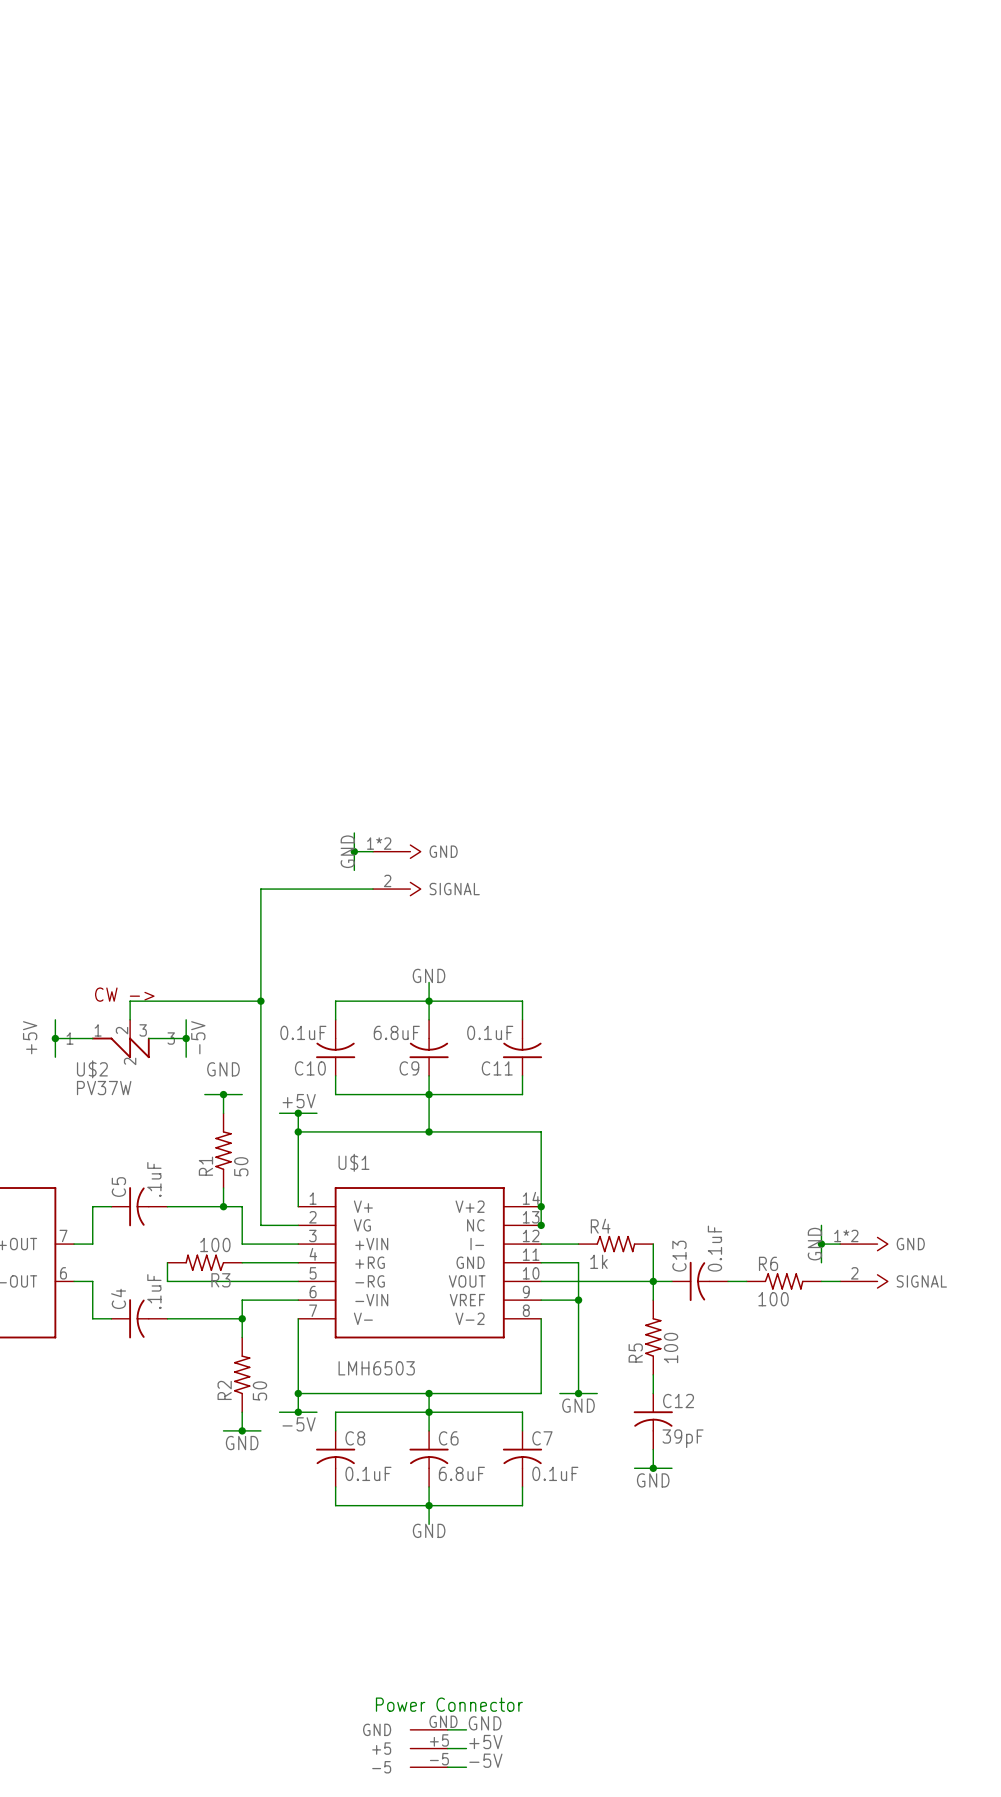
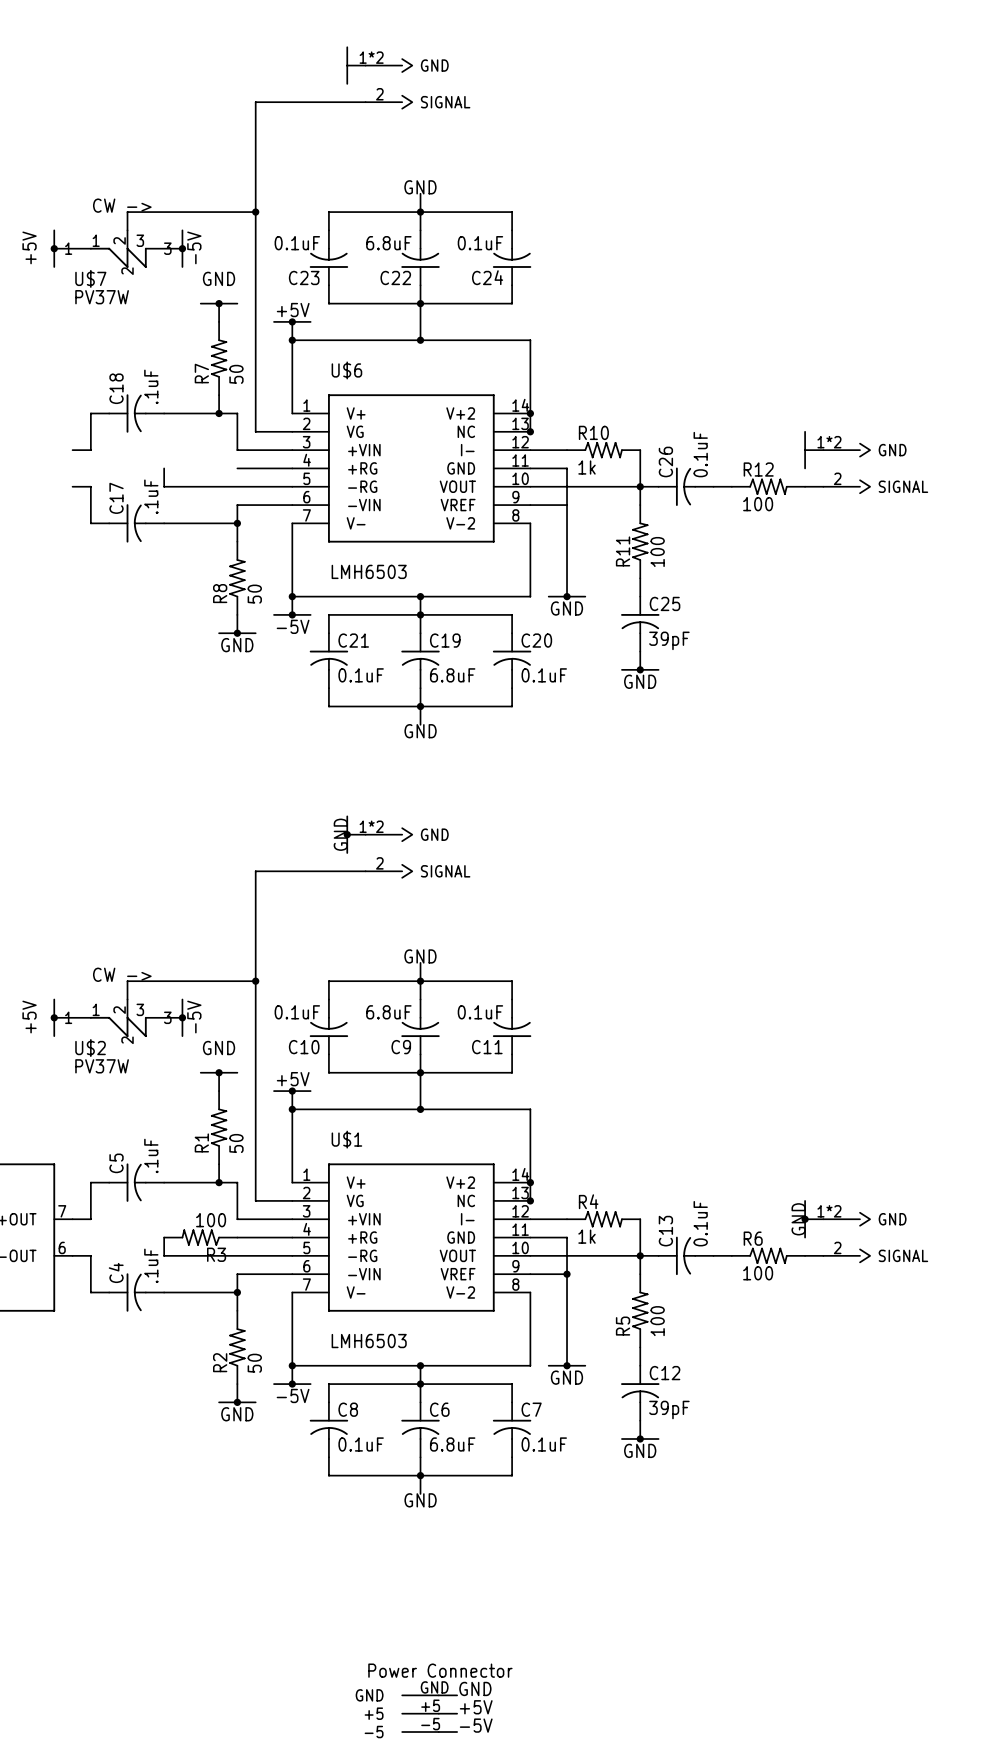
wire: none -> (347, 47) (347, 83)
wire: none -> (347, 65) (365, 65)
part: none -> (388, 83)
wire: none -> (365, 102) (255, 102) (255, 431) (292, 431)
label: none -> GND (420, 187)
wire: none -> (420, 193) (420, 230)
wire: none -> (255, 212) (127, 212) (127, 230)
junction: none -> (255, 212)
junction: none -> (420, 212)
wire: none -> (54, 230) (54, 266)
wire: none -> (182, 230) (182, 266)
wire: none -> (328, 230) (328, 212) (512, 212) (512, 230)
label: none -> +5V (29, 247)
label: none -> -5V (194, 247)
wire: none -> (54, 248) (90, 248)
junction: none -> (54, 248)
wire: none -> (145, 248) (182, 248)
junction: none -> (182, 248)
U$7: none -> PV37W (118, 249)
C23: none -> 0.1uF (328, 257)
C22: none -> 6.8uF (420, 257)
C24: none -> 0.1uF (512, 257)
label: none -> GND (219, 278)
wire: none -> (328, 285) (328, 303) (512, 303) (512, 285)
wire: none -> (420, 285) (420, 340)
wire: none -> (200, 303) (237, 303)
wire: none -> (219, 303) (219, 321)
junction: none -> (219, 303)
junction: none -> (420, 303)
label: none -> +5V (293, 310)
wire: none -> (274, 321) (310, 321)
wire: none -> (292, 321) (292, 413)
junction: none -> (292, 321)
wire: none -> (292, 340) (530, 340) (530, 431)
junction: none -> (292, 340)
junction: none -> (420, 340)
R7: none -> 50 (219, 358)
wire: none -> (219, 395) (219, 413)
wire: none -> (109, 413) (90, 413) (90, 450) (72, 450)
C18: none -> .1uF (136, 413)
wire: none -> (164, 413) (237, 413) (237, 450) (292, 450)
junction: none -> (219, 413)
junction: none -> (530, 413)
junction: none -> (530, 431)
wire: none -> (805, 431) (805, 468)
wire: none -> (530, 450) (567, 450)
R10: none -> 1k (603, 450)
wire: none -> (640, 450) (640, 505)
wire: none -> (805, 450) (823, 450)
wire: none -> (164, 468) (164, 486) (292, 486)
wire: none -> (237, 468) (292, 468)
U$6: none -> LMH6503 (411, 468)
wire: none -> (530, 468) (567, 468) (567, 596)
part: none -> (846, 468)
wire: none -> (72, 486) (90, 486) (90, 523) (109, 523)
wire: none -> (530, 486) (658, 486)
junction: none -> (640, 486)
C26: none -> 0.1uF (686, 486)
wire: none -> (713, 486) (731, 486)
R12: none -> 100 (768, 486)
wire: none -> (805, 486) (823, 486)
wire: none -> (292, 505) (237, 505) (237, 541)
wire: none -> (530, 505) (567, 505)
C17: none -> .1uF (136, 523)
wire: none -> (164, 523) (237, 523)
junction: none -> (237, 523)
wire: none -> (292, 523) (292, 614)
wire: none -> (530, 523) (530, 596) (292, 596)
R11: none -> 100 (640, 541)
R8: none -> 50 (237, 578)
wire: none -> (640, 578) (640, 596)
junction: none -> (292, 596)
wire: none -> (420, 596) (420, 633)
junction: none -> (420, 596)
wire: none -> (548, 596) (585, 596)
junction: none -> (567, 596)
label: none -> GND (566, 608)
wire: none -> (237, 614) (237, 633)
wire: none -> (274, 614) (310, 614)
junction: none -> (292, 614)
junction: none -> (420, 614)
C25: none -> 39pF (640, 624)
label: none -> -5V (293, 626)
wire: none -> (219, 633) (255, 633)
junction: none -> (237, 633)
wire: none -> (328, 633) (328, 614) (512, 614) (512, 633)
label: none -> GND (237, 645)
wire: none -> (640, 651) (640, 669)
C21: none -> 0.1uF (328, 660)
C19: none -> 6.8uF (420, 660)
C20: none -> 0.1uF (512, 660)
wire: none -> (621, 669) (658, 669)
junction: none -> (640, 669)
label: none -> GND (640, 681)
wire: none -> (328, 688) (328, 706) (512, 706) (512, 688)
wire: none -> (420, 688) (420, 724)
junction: none -> (420, 706)
label: none -> GND (420, 731)

